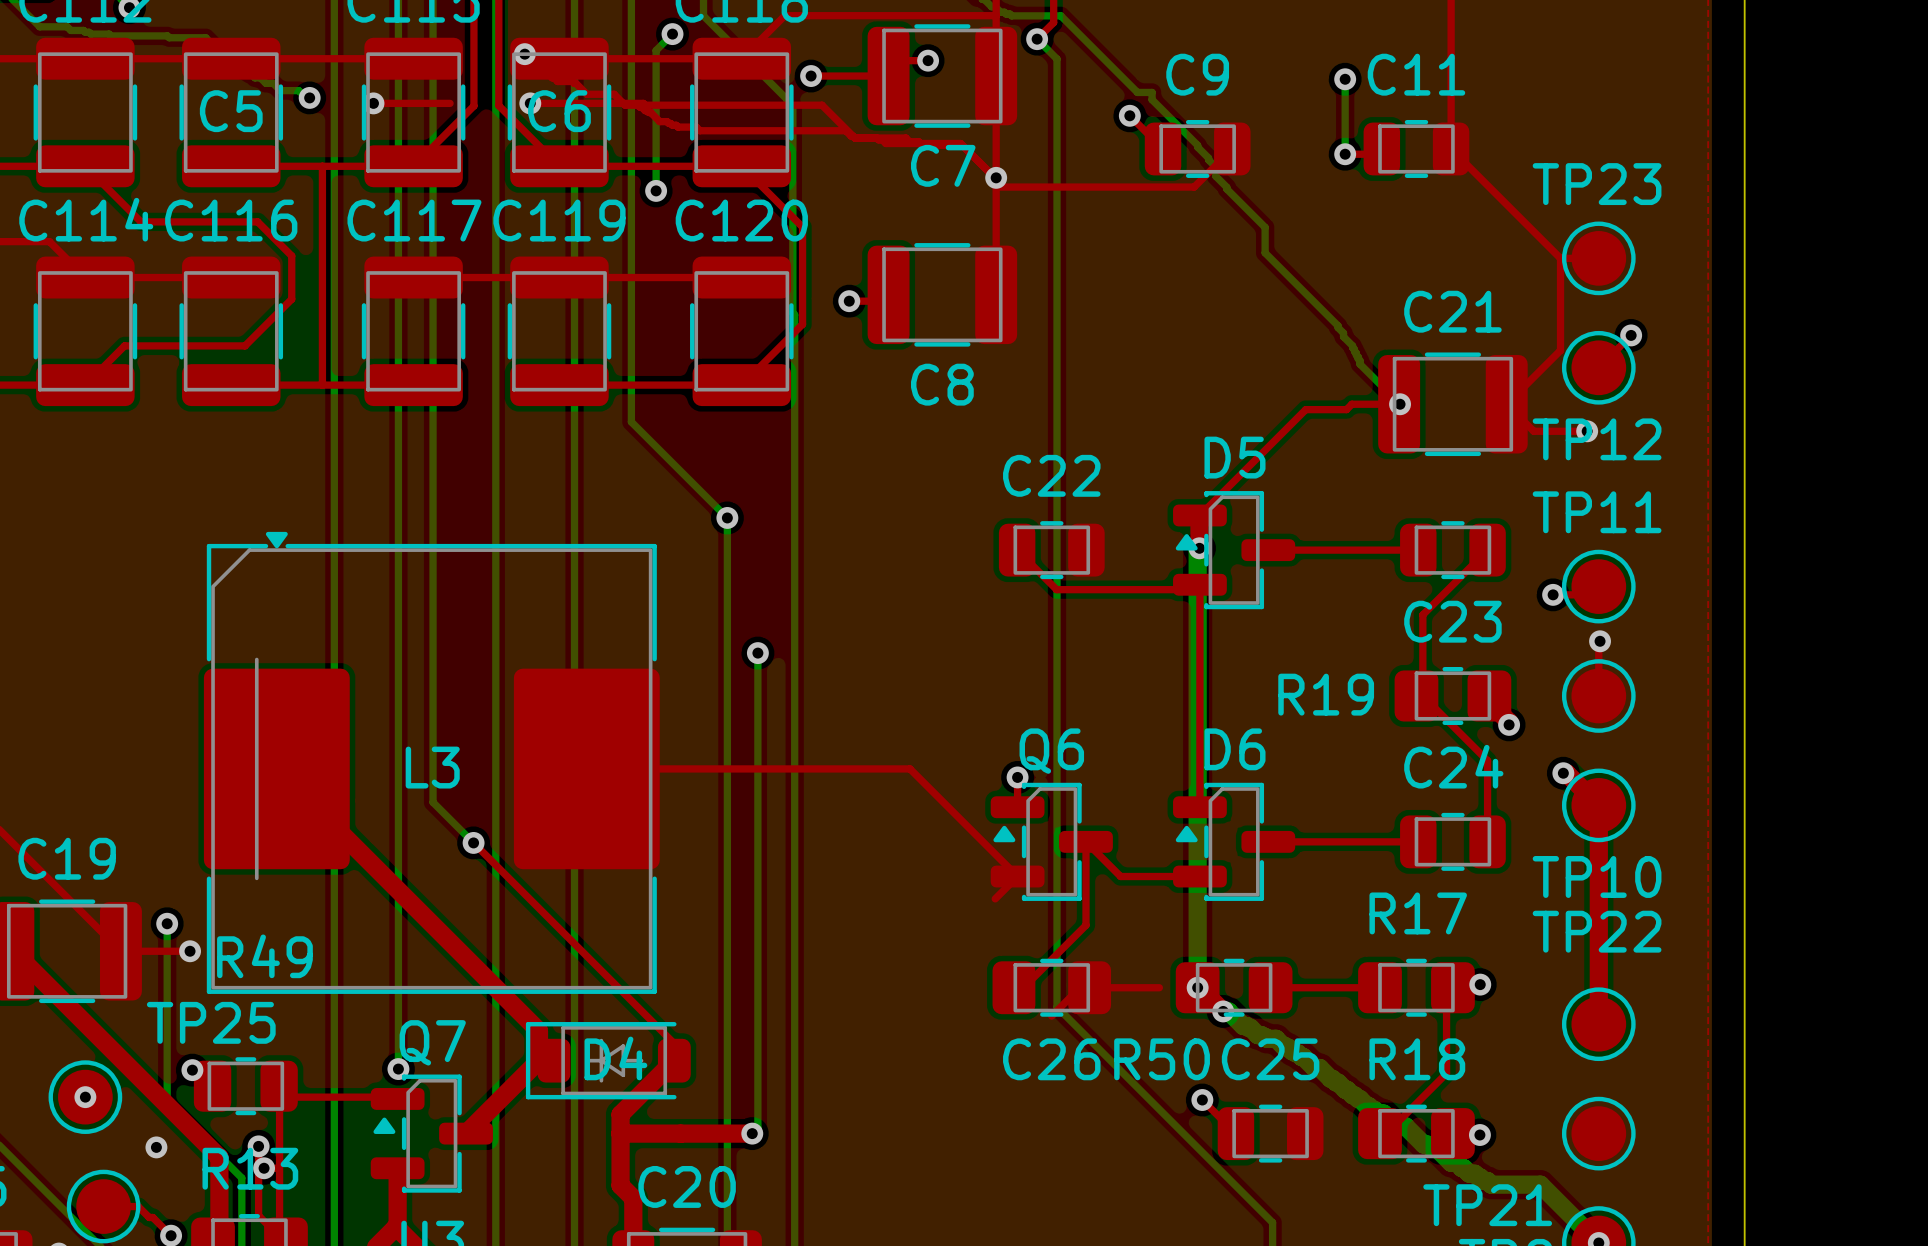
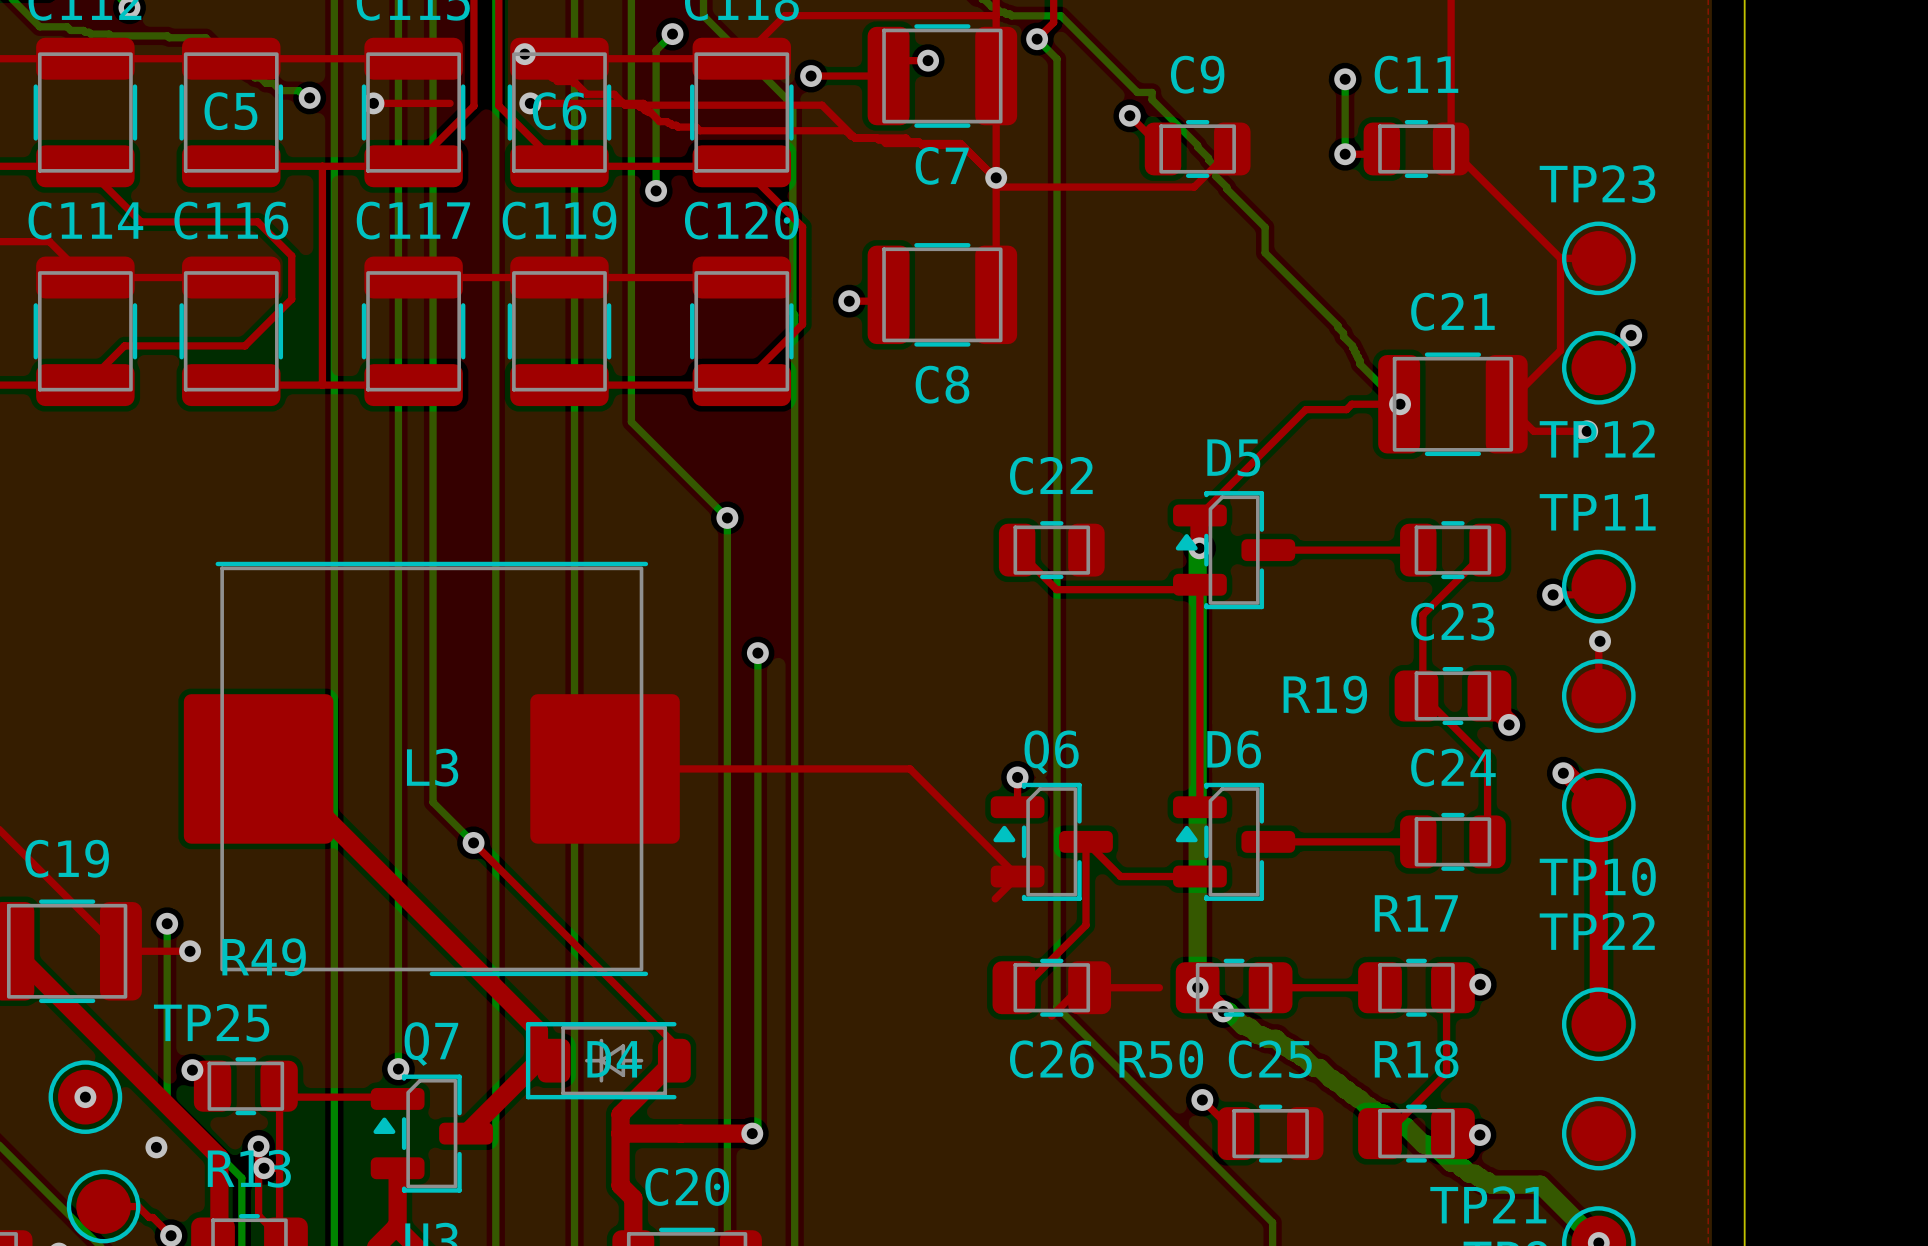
L3 footprint: [203, 531, 660, 994] -> [183, 561, 680, 977]

